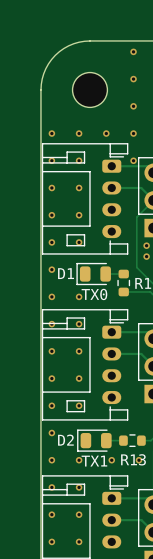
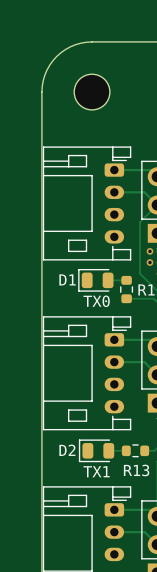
via: (133, 51) -> none
via: (133, 79) -> none
via: (133, 106) -> none
via: (51, 133) -> none
via: (79, 133) -> none
via: (106, 133) -> none
via: (133, 133) -> none
via: (51, 160) -> none
via: (79, 160) -> none
via: (133, 160) -> none
via: (51, 187) -> none
via: (79, 187) -> none
via: (51, 215) -> none
via: (79, 215) -> none
via: (51, 242) -> none
via: (79, 242) -> none
via: (51, 269) -> none
via: (51, 296) -> none
via: (79, 296) -> none
via: (51, 324) -> none
via: (79, 324) -> none
via: (51, 351) -> none
via: (79, 351) -> none
via: (51, 378) -> none
via: (79, 378) -> none
via: (51, 405) -> none
via: (79, 405) -> none
via: (51, 433) -> none
via: (51, 460) -> none
via: (79, 460) -> none
via: (111, 460) -> none
via: (138, 460) -> none
via: (51, 487) -> none
via: (79, 487) -> none
via: (51, 514) -> none
via: (79, 514) -> none
via: (51, 541) -> none
via: (79, 541) -> none

